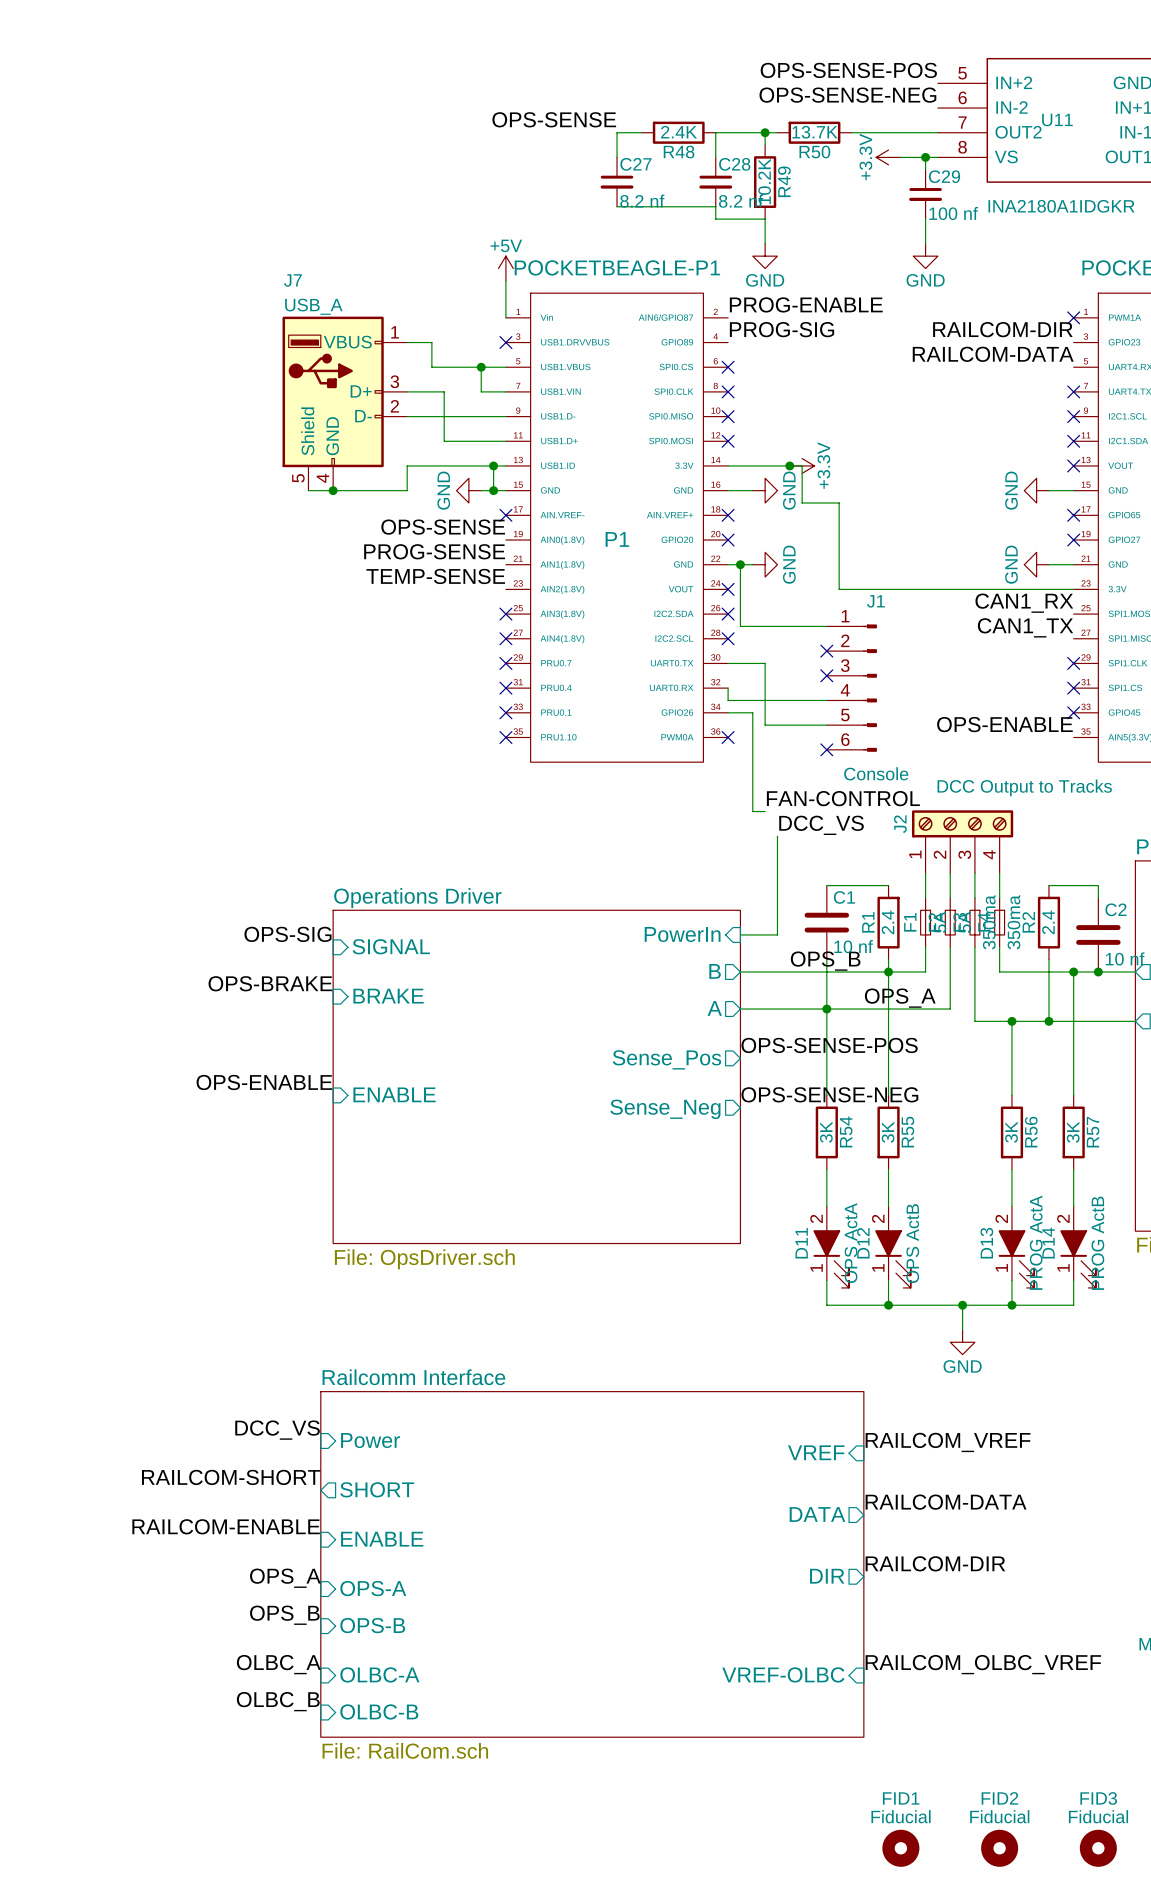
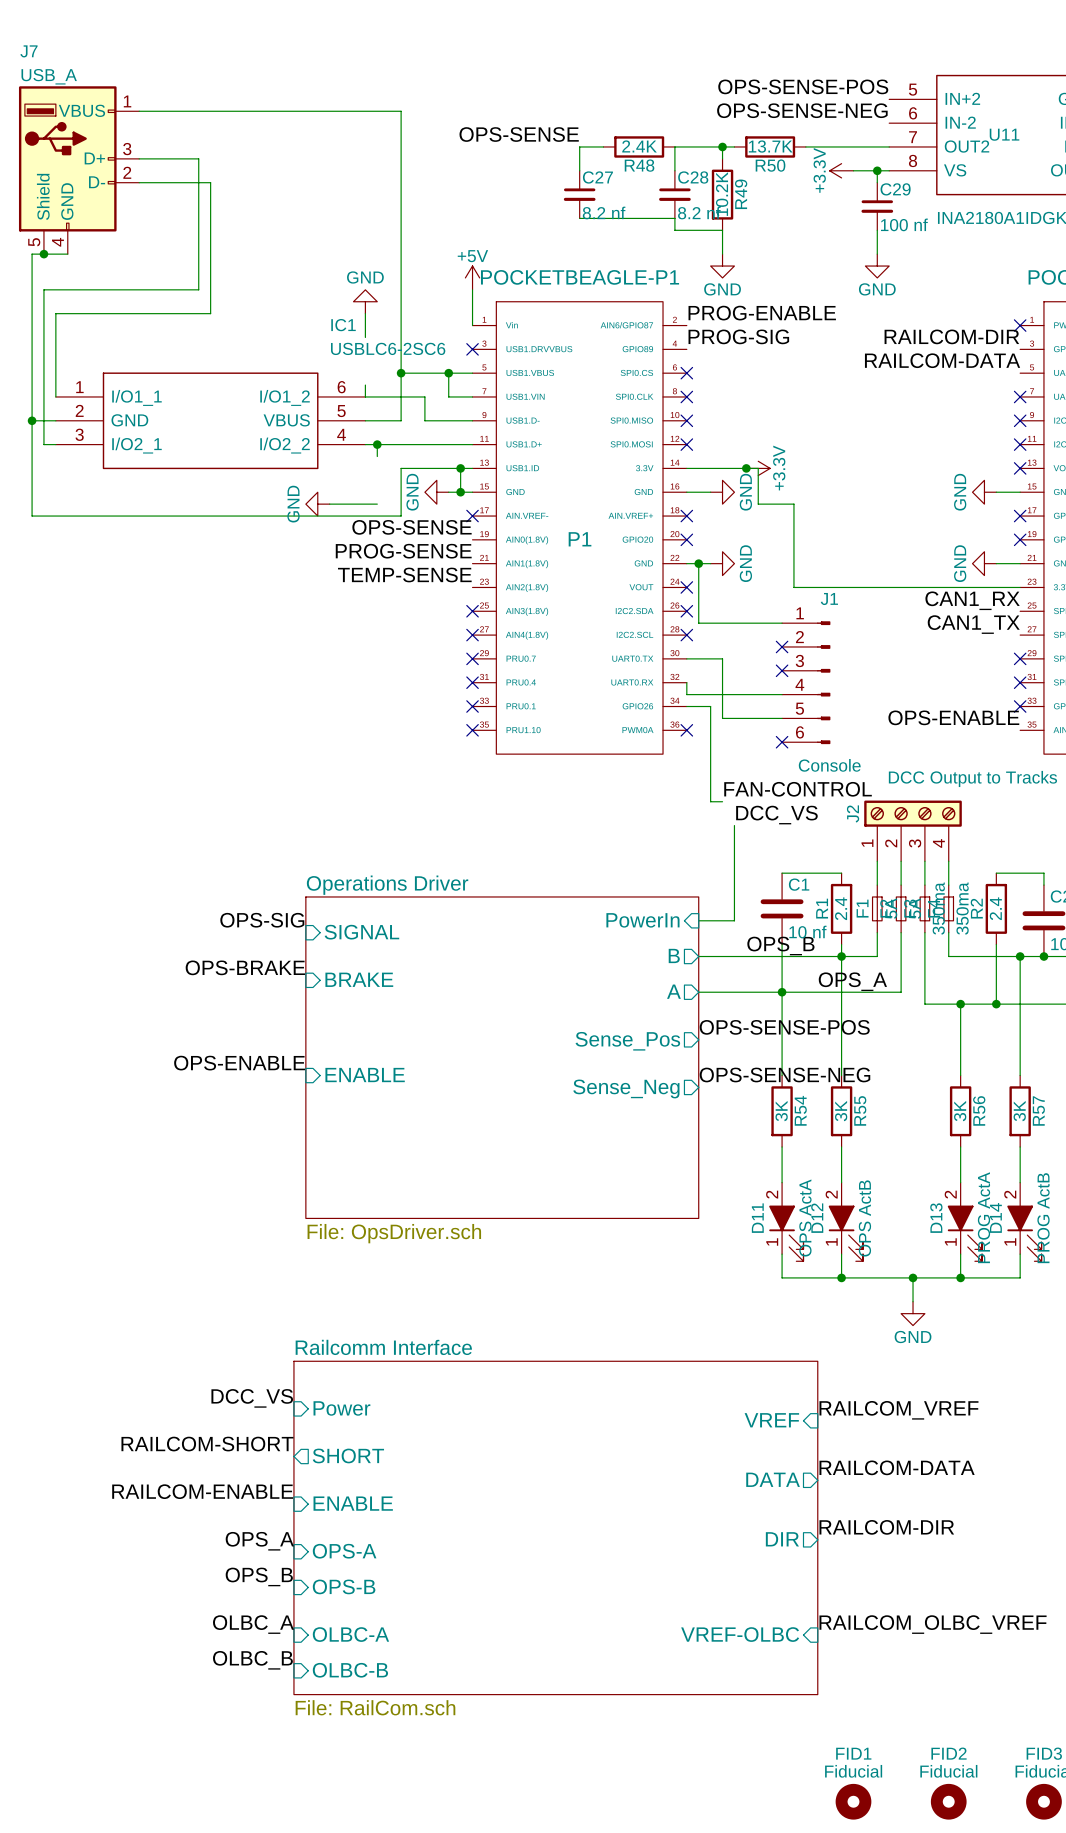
wire: none -> (139, 158) (198, 158) (198, 289) (43, 289) (43, 444) (55, 444)
wire: none -> (139, 182) (210, 182) (210, 313) (55, 313) (55, 396)
junction: none -> (43, 254)
power symbol: none -> GND (365, 301)
wire: none -> (365, 313) (365, 337)
wire: (407, 342) (431, 342) -> (139, 111) (401, 111) (401, 349)
wire: none -> (401, 373) (401, 420)
junction: none -> (401, 373)
wire: (444, 391) (444, 441) -> (365, 444) (413, 444)
J7 position: (344, 403) -> (79, 170)
wire: none -> (32, 420) (55, 420)
junction: none -> (32, 420)
IC1: none -> USBLC6-2SC6 (210, 420)
wire: (431, 416) (456, 416) -> (413, 396) (424, 396) (424, 420)
wire: none -> (377, 444) (377, 456)
junction: none -> (377, 444)
wire: (431, 465) (407, 465) (407, 490) (308, 490) -> (401, 468) (401, 516) (32, 516) (32, 254) (67, 254)
junction: (333, 490) -> none
power symbol: none -> GND (317, 504)
wire: none -> (329, 504) (377, 504)

